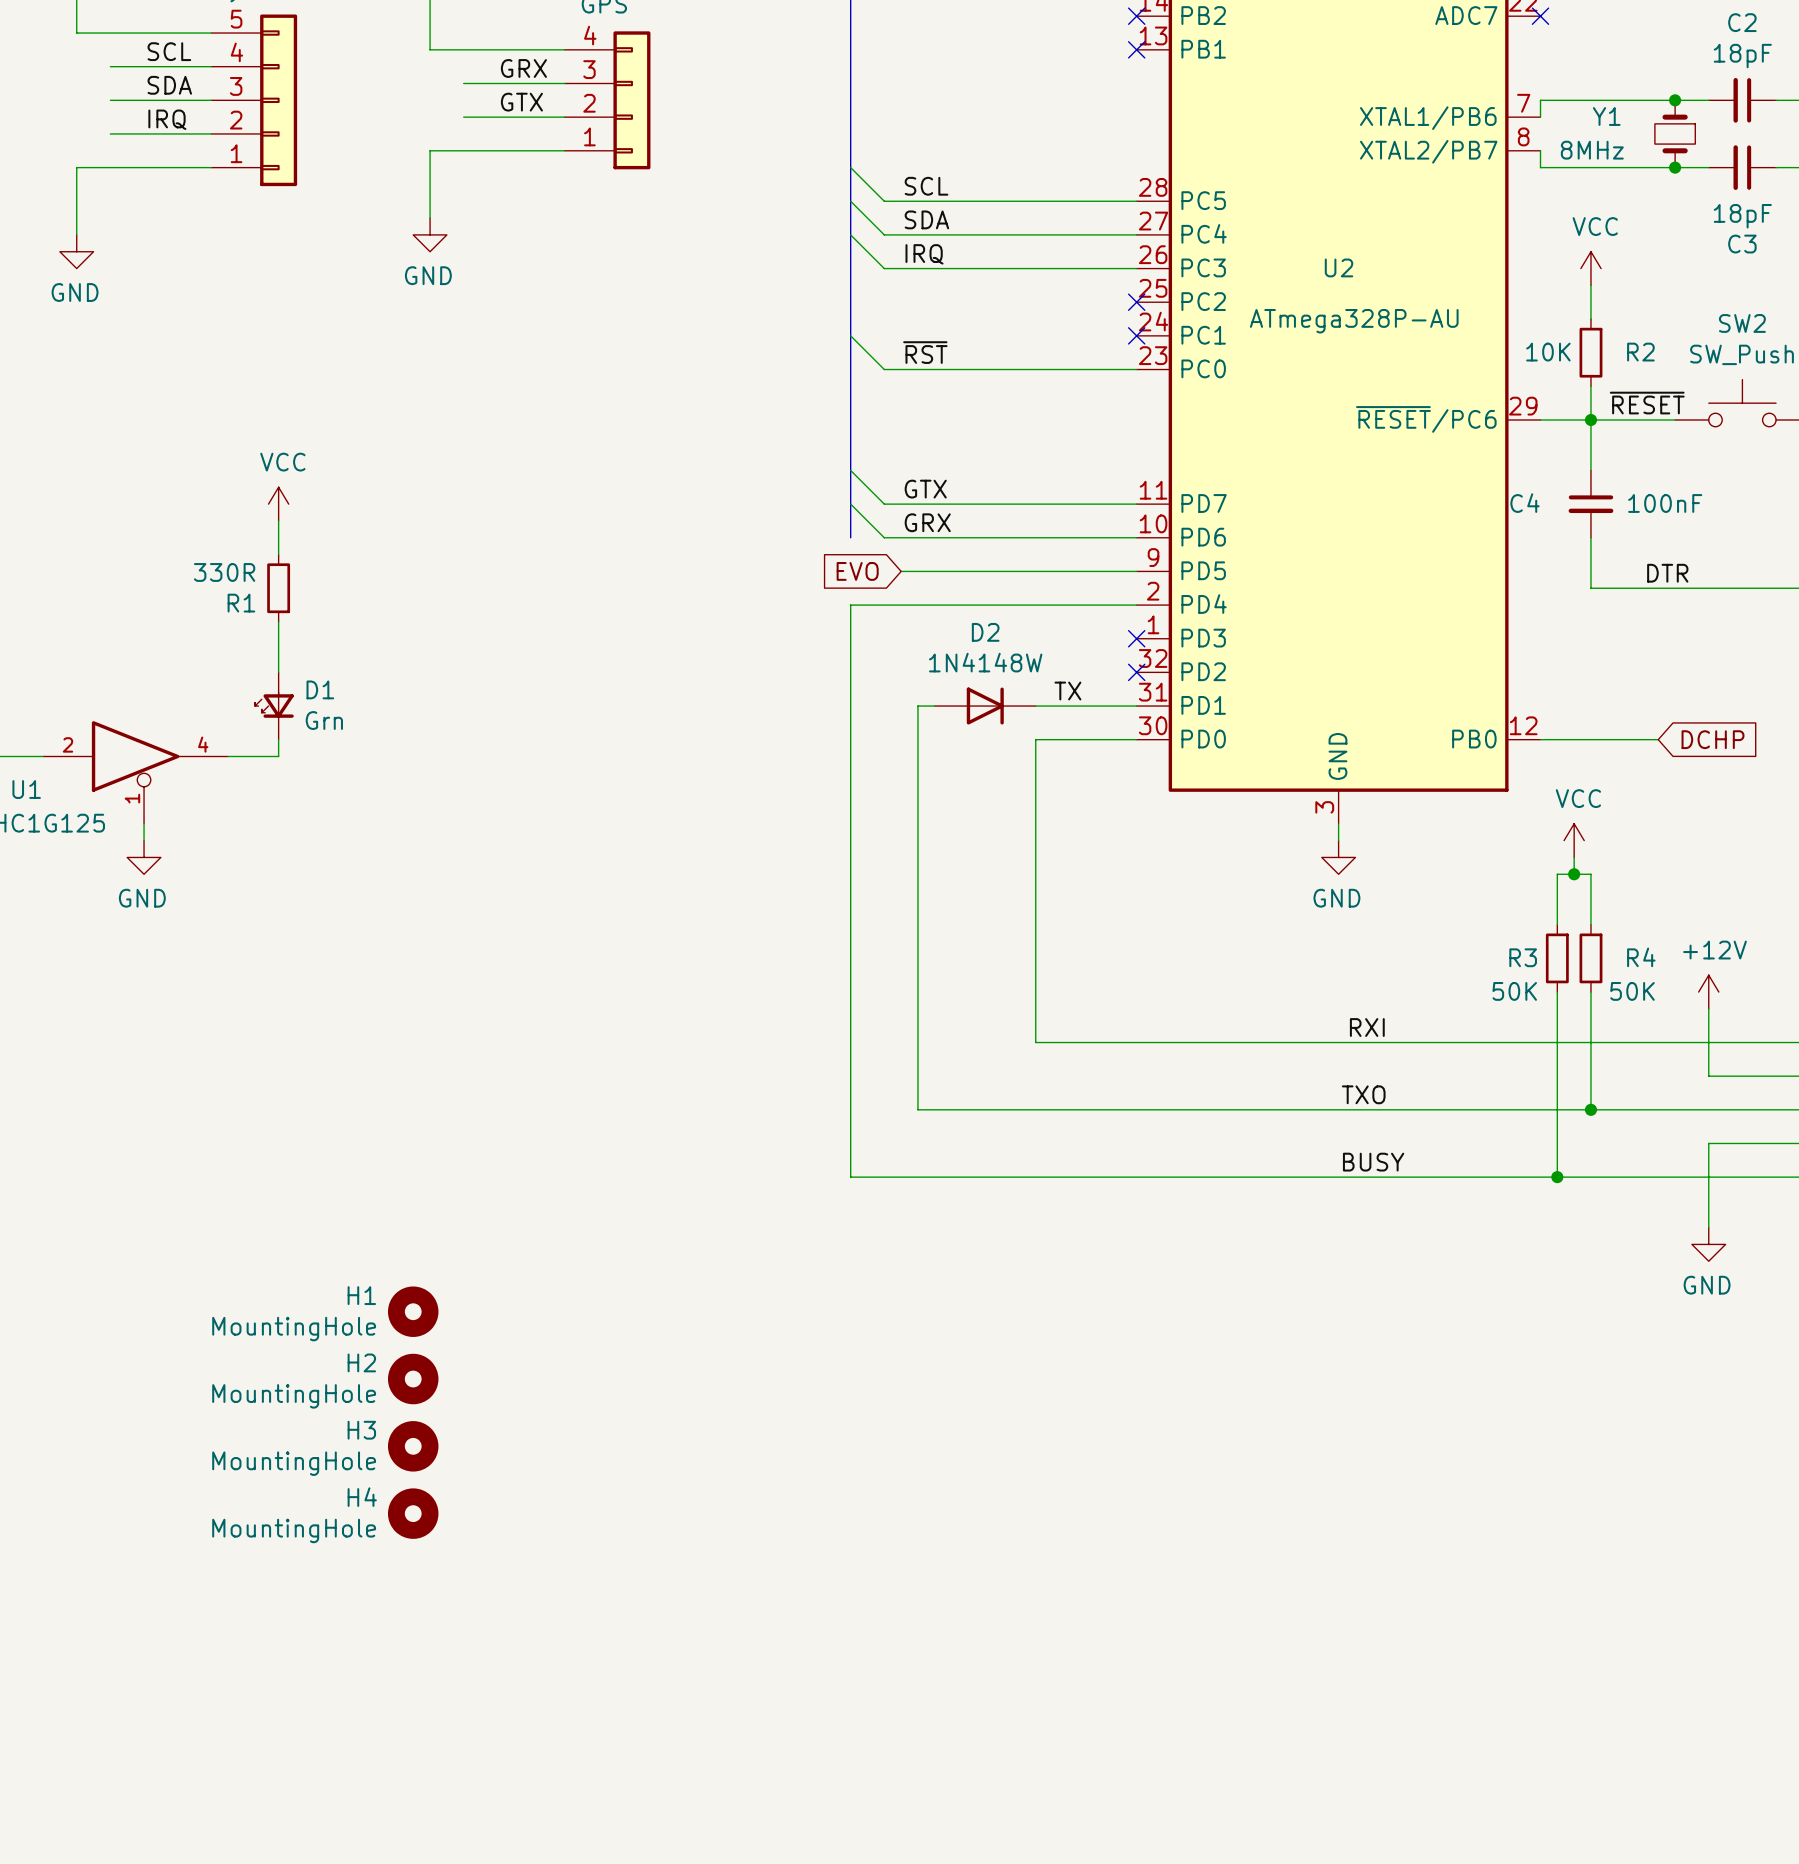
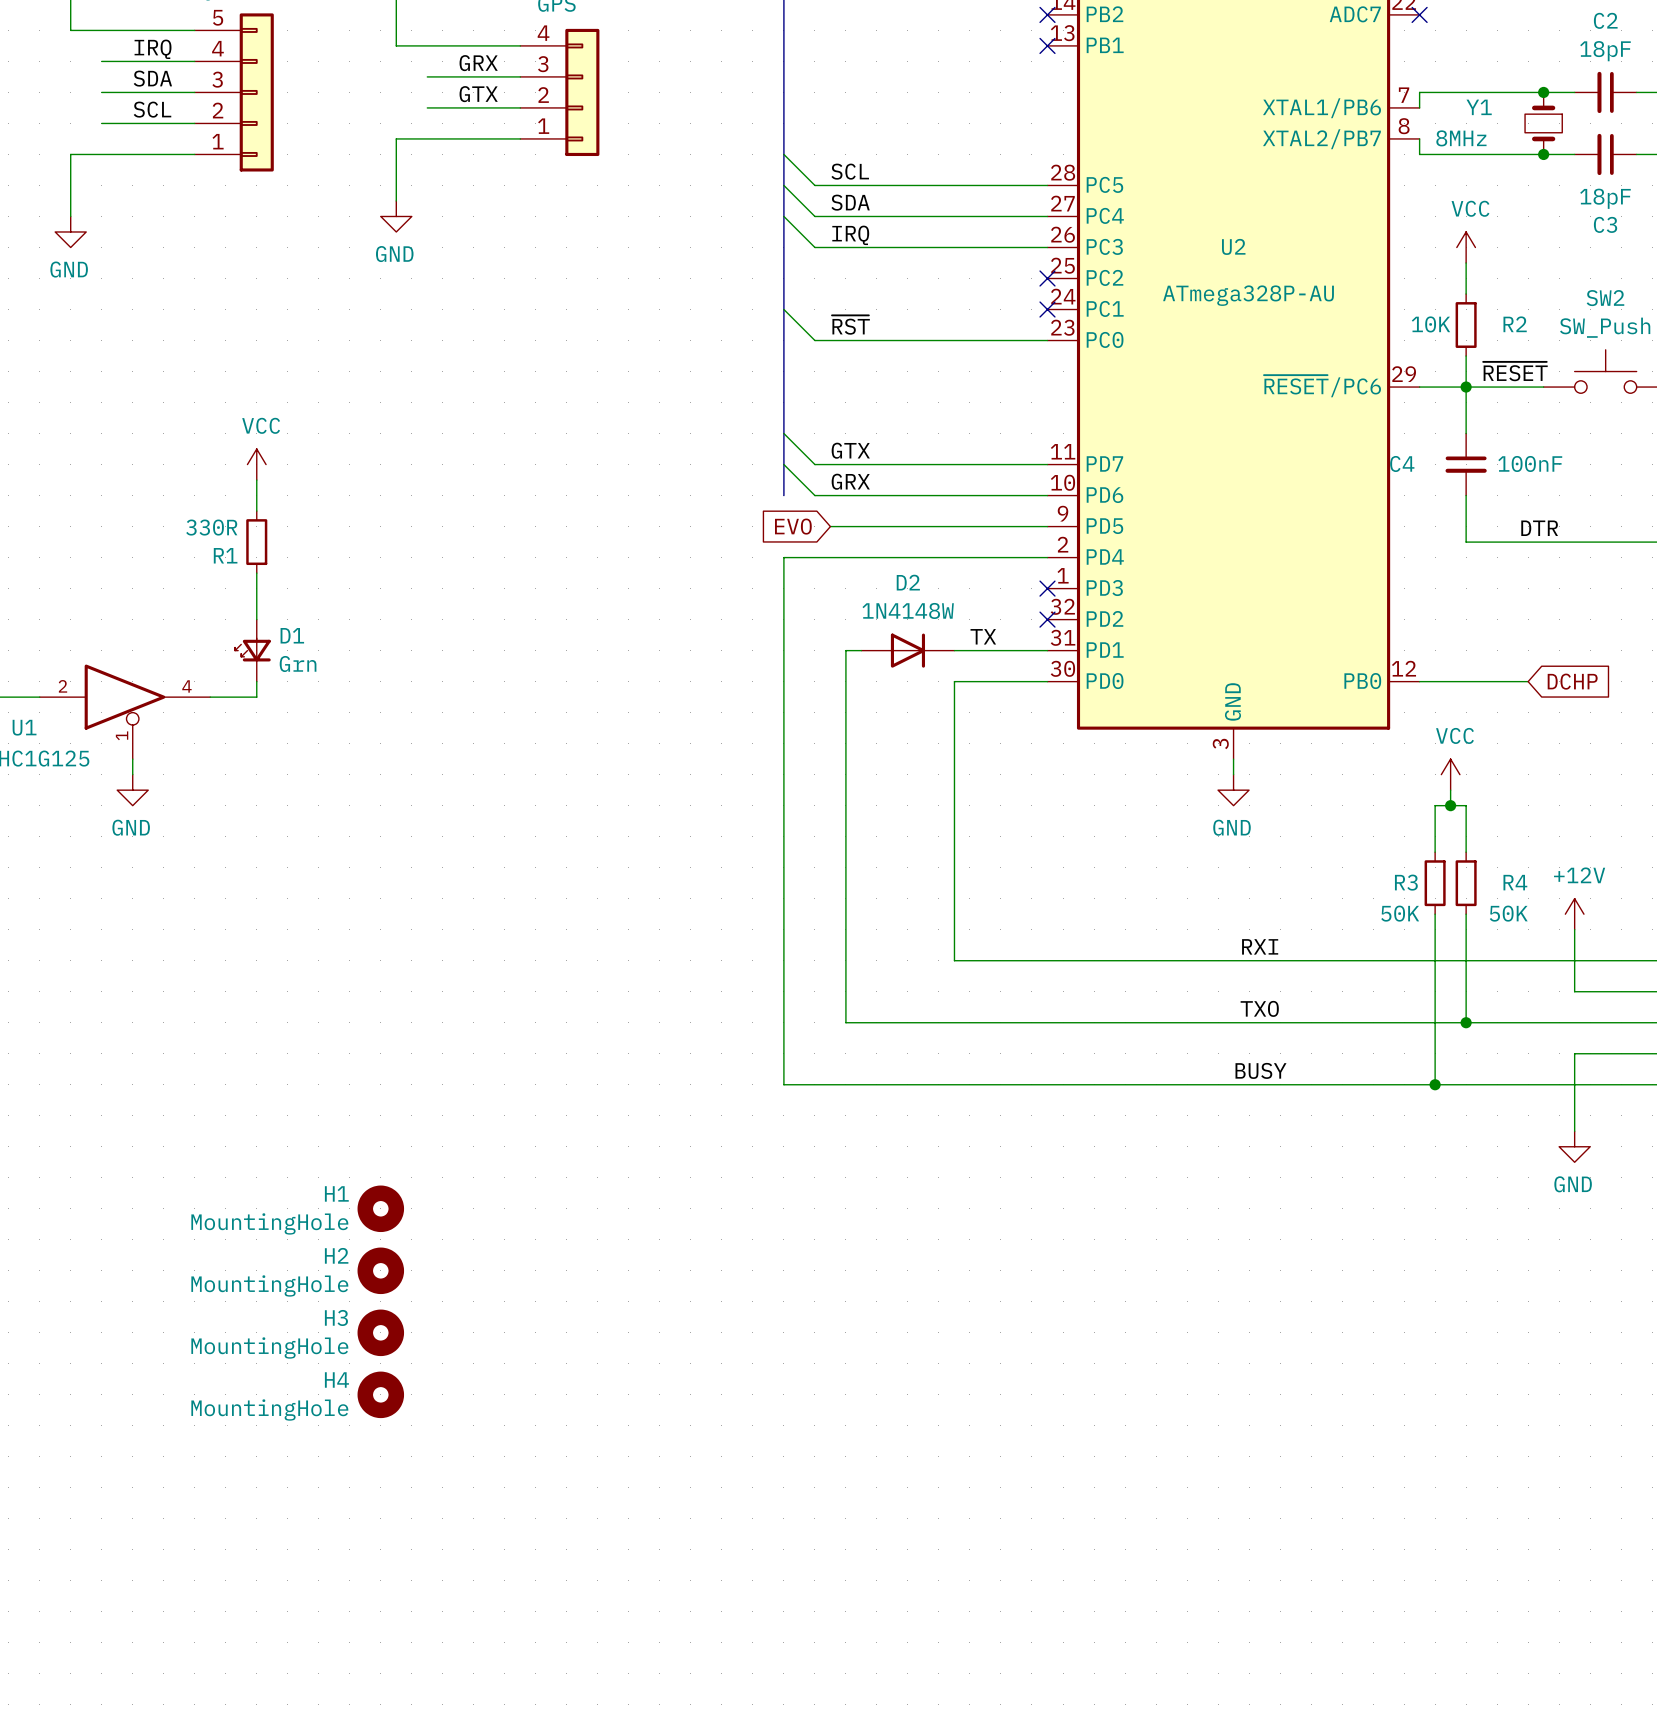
label: SCL (169, 51) -> IRQ (153, 49)
label: IRQ (167, 119) -> SCL (152, 109)

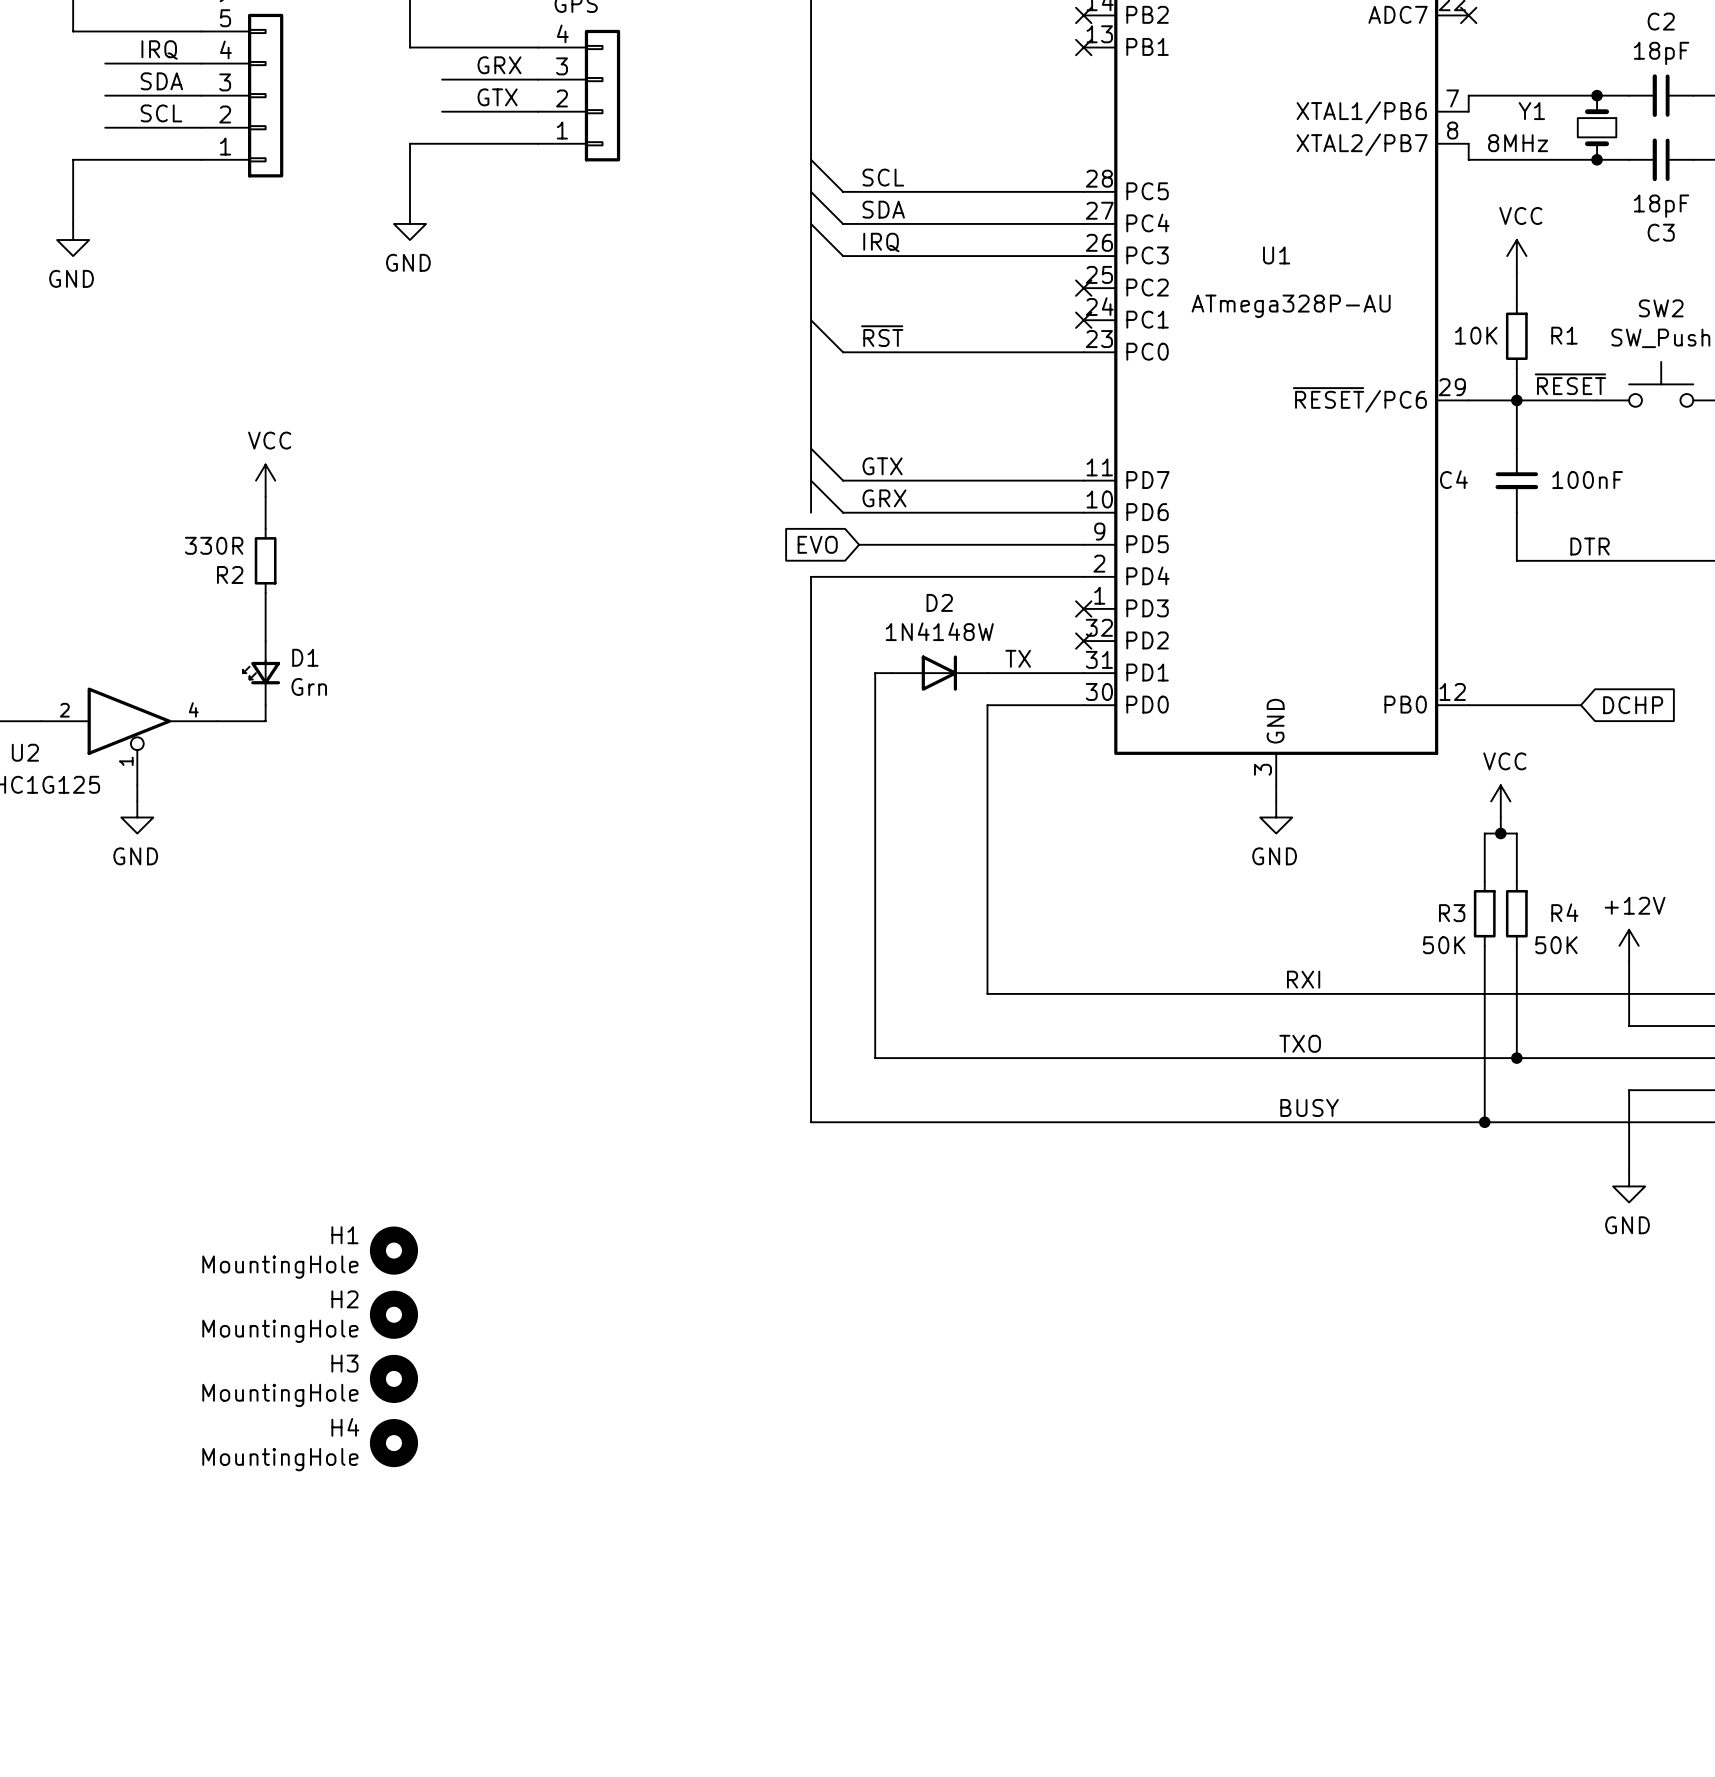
U2 name: U2 (1233, 246) -> U1 (1276, 255)
R2 name: R2 (1515, 324) -> R1 (1564, 335)
R1 name: R1 (225, 555) -> R2 (230, 574)
U1 name: U1 (24, 727) -> U2 (25, 752)

